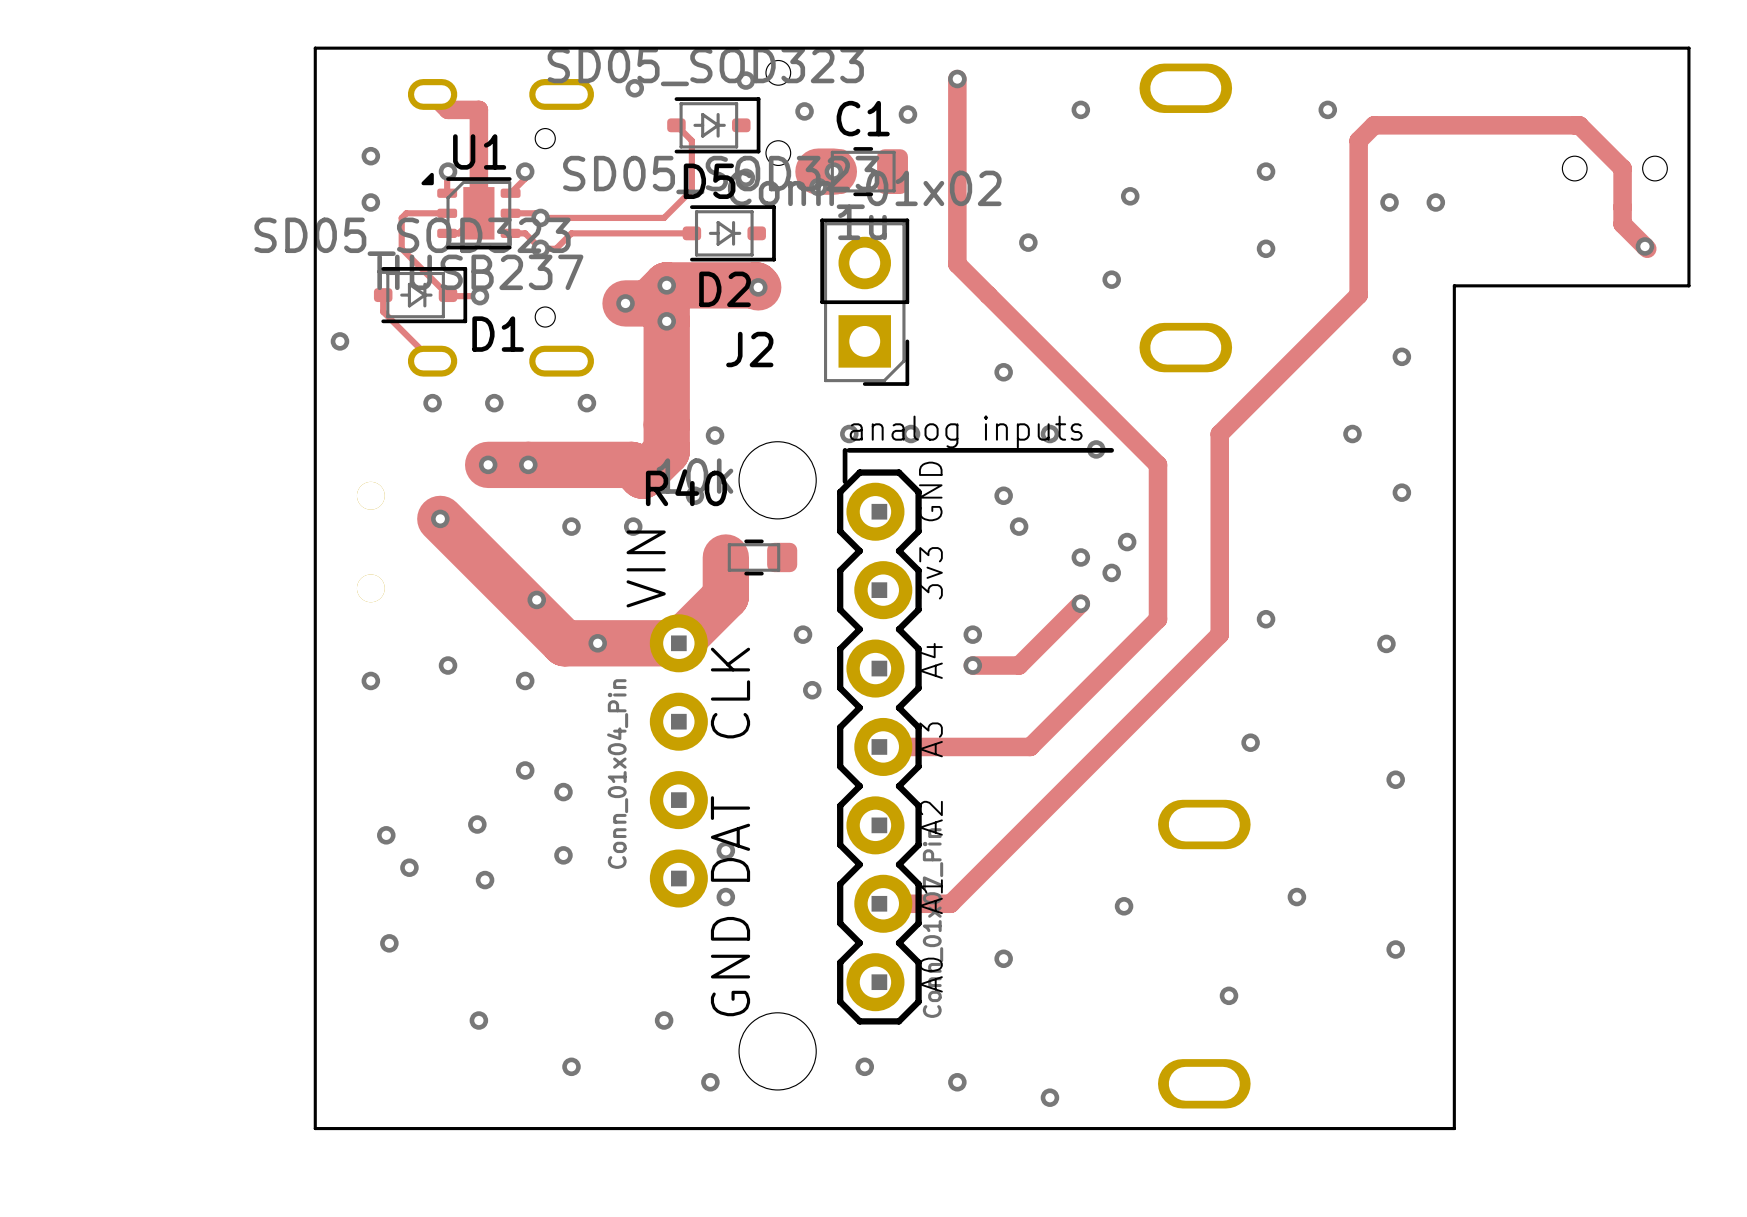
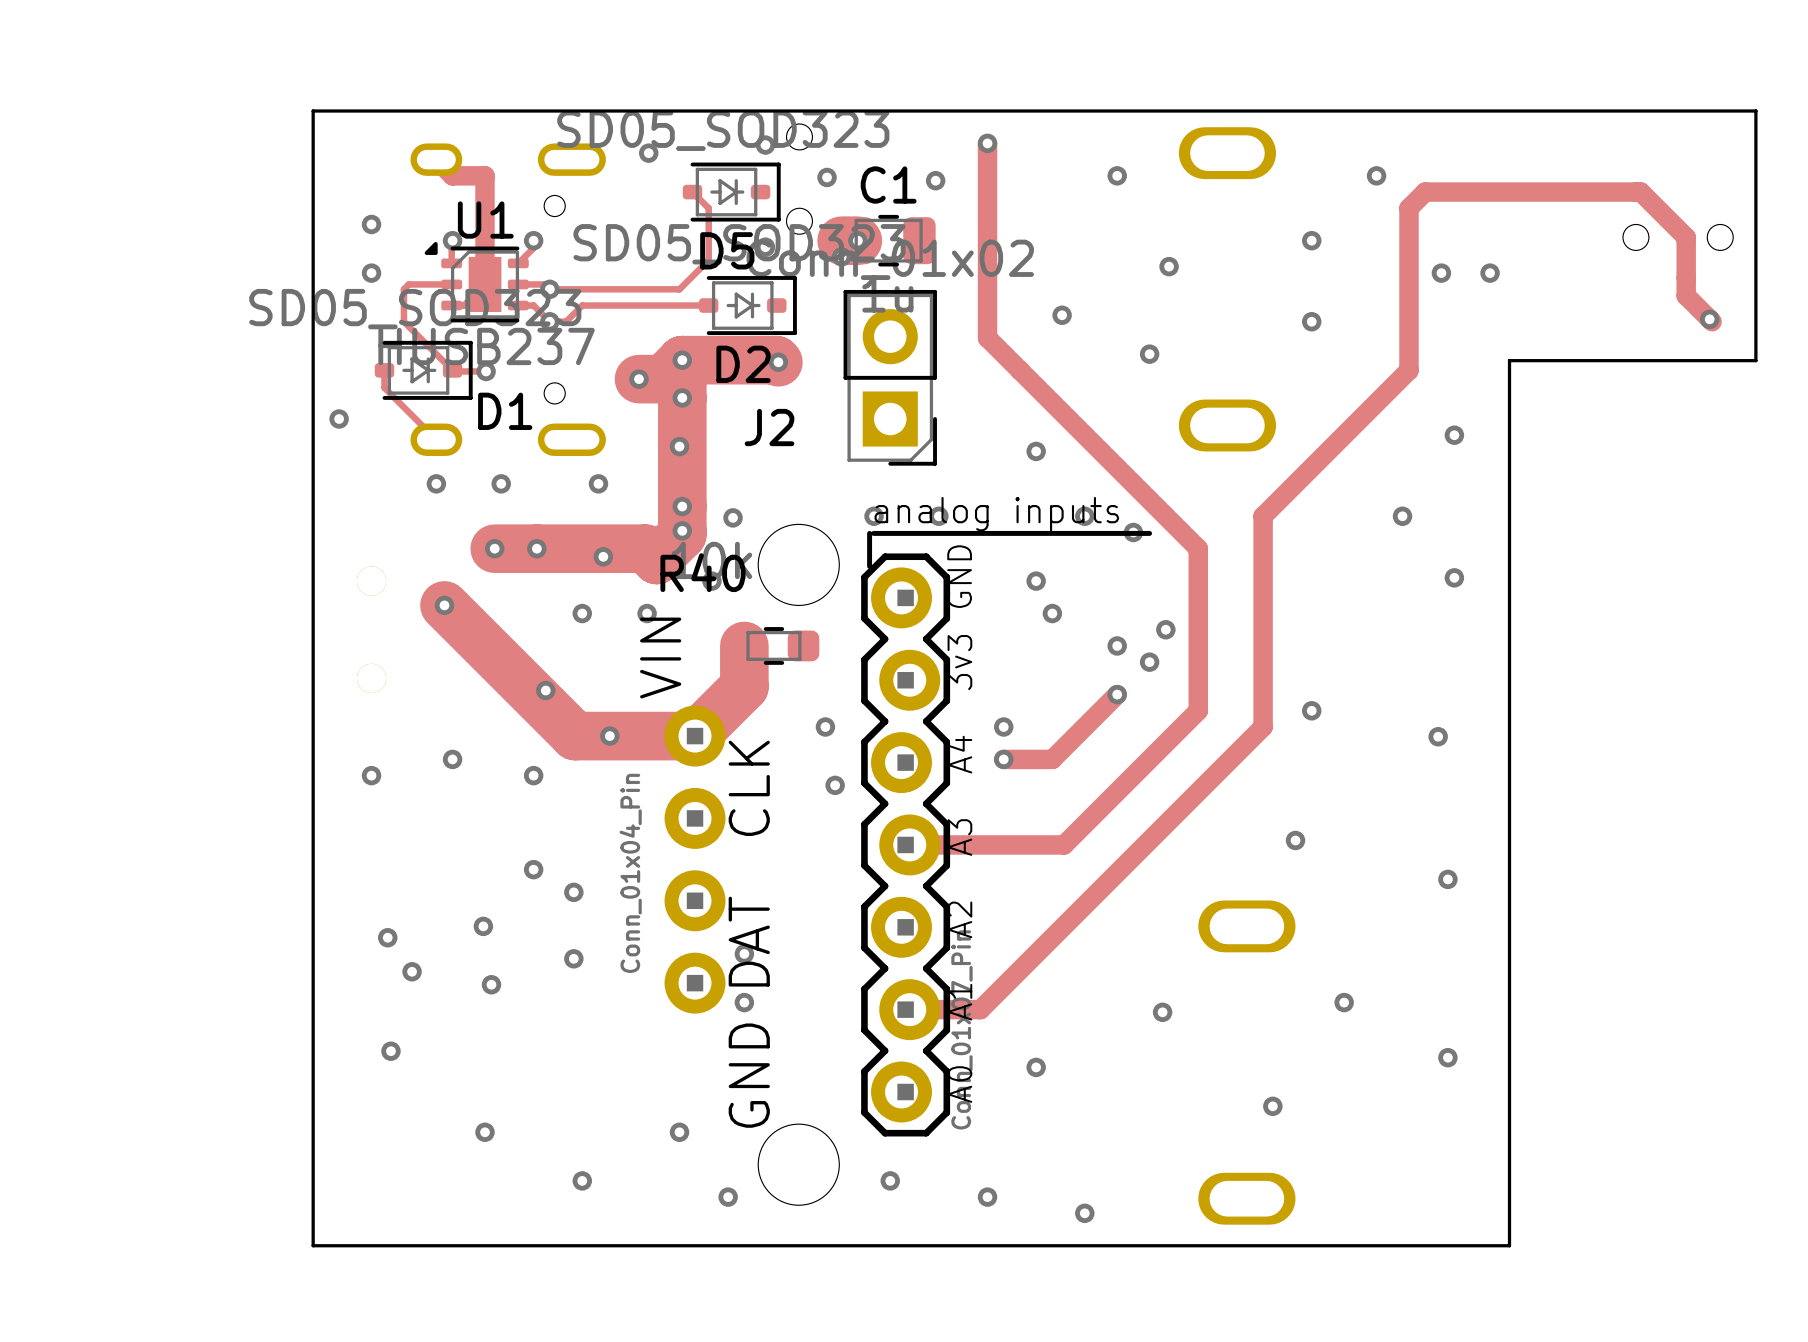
via: none -> (679, 446)
via: none -> (682, 506)
via: none -> (682, 530)
via: none -> (603, 556)

